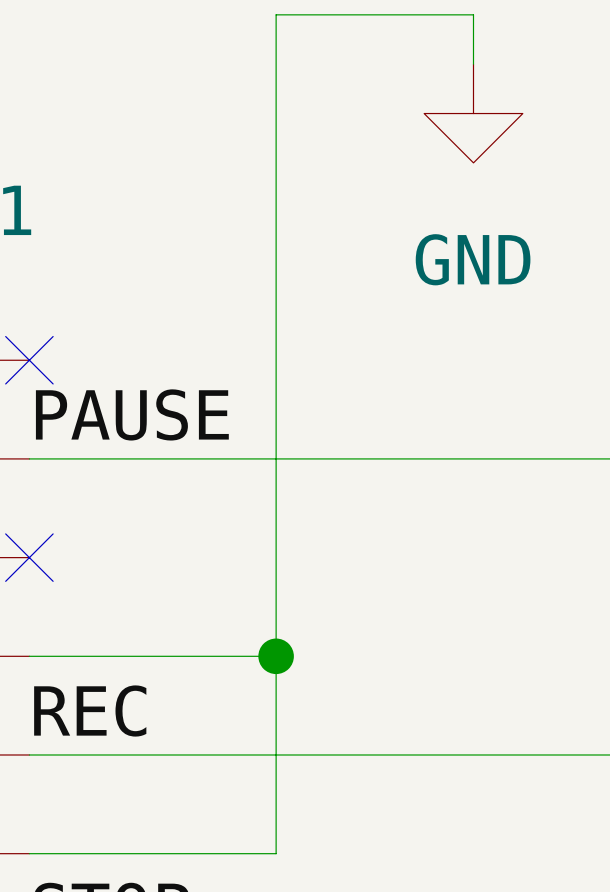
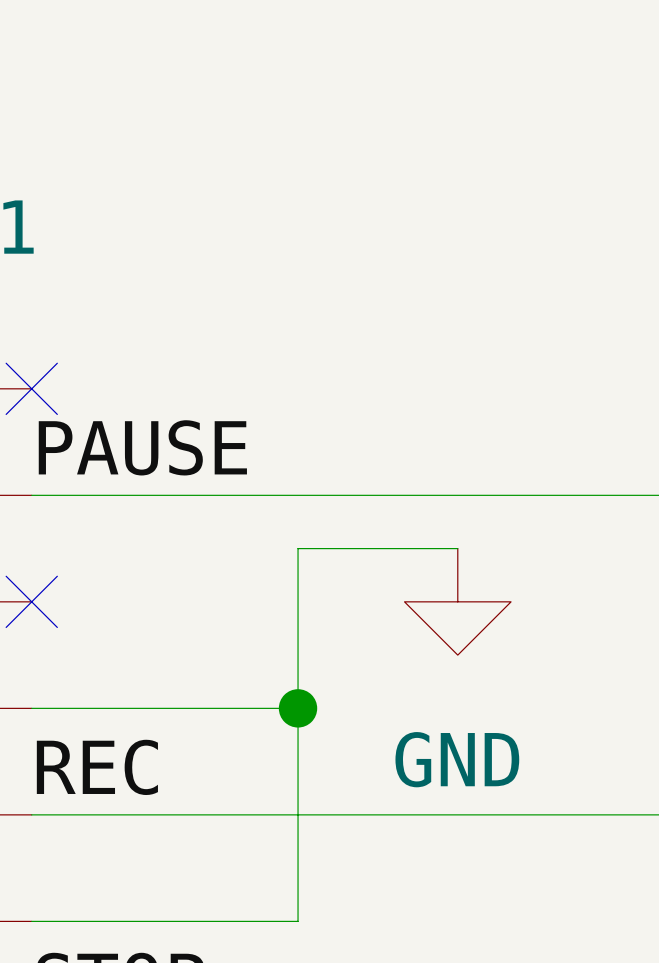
wire: (473, 64) (473, 14) (276, 14) (276, 508) -> (457, 548) (298, 548)
power symbol position: GND (473, 113) -> GND (457, 601)

